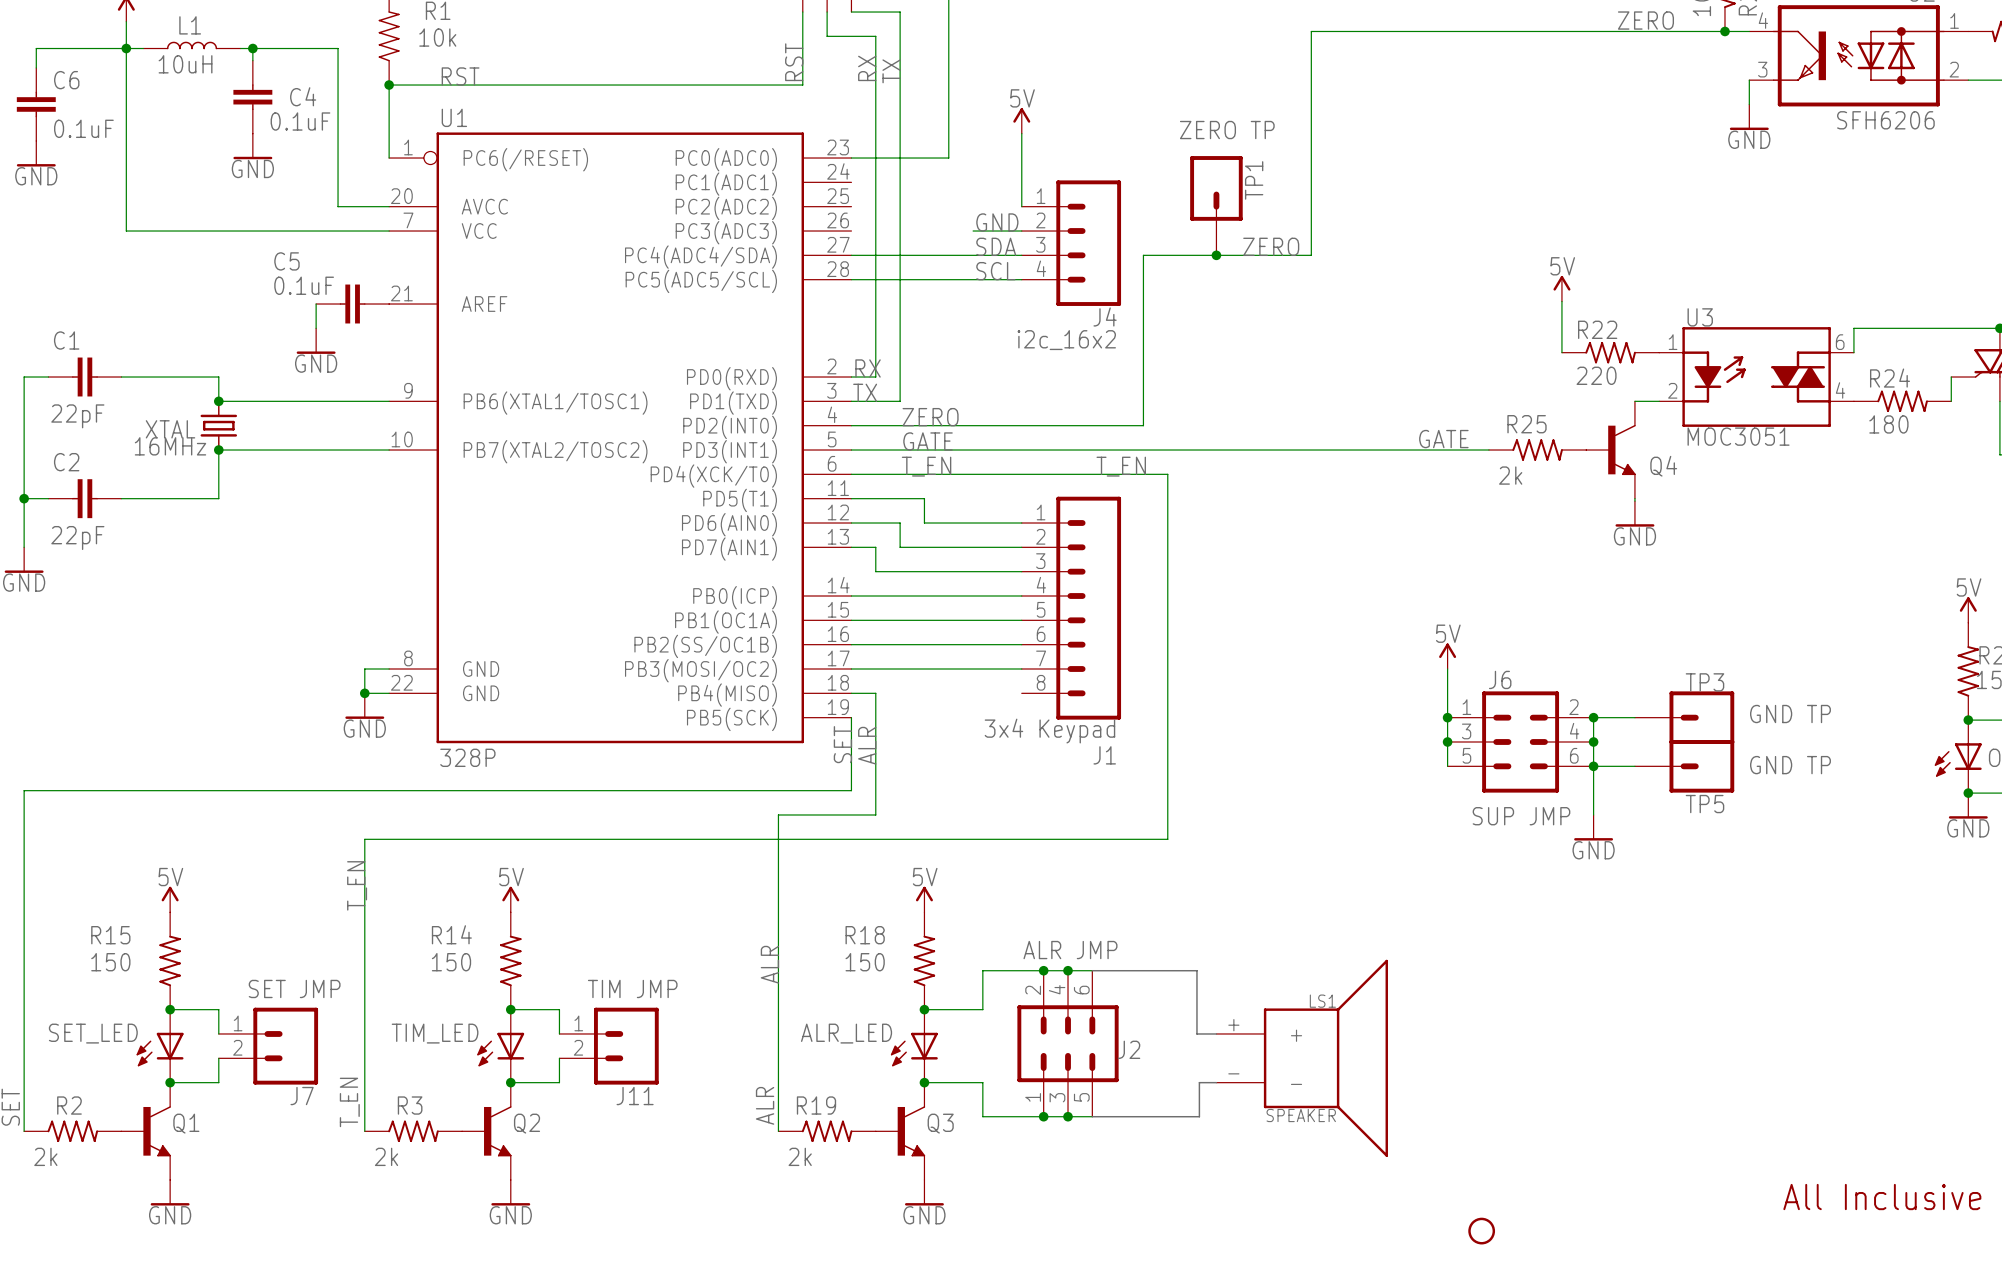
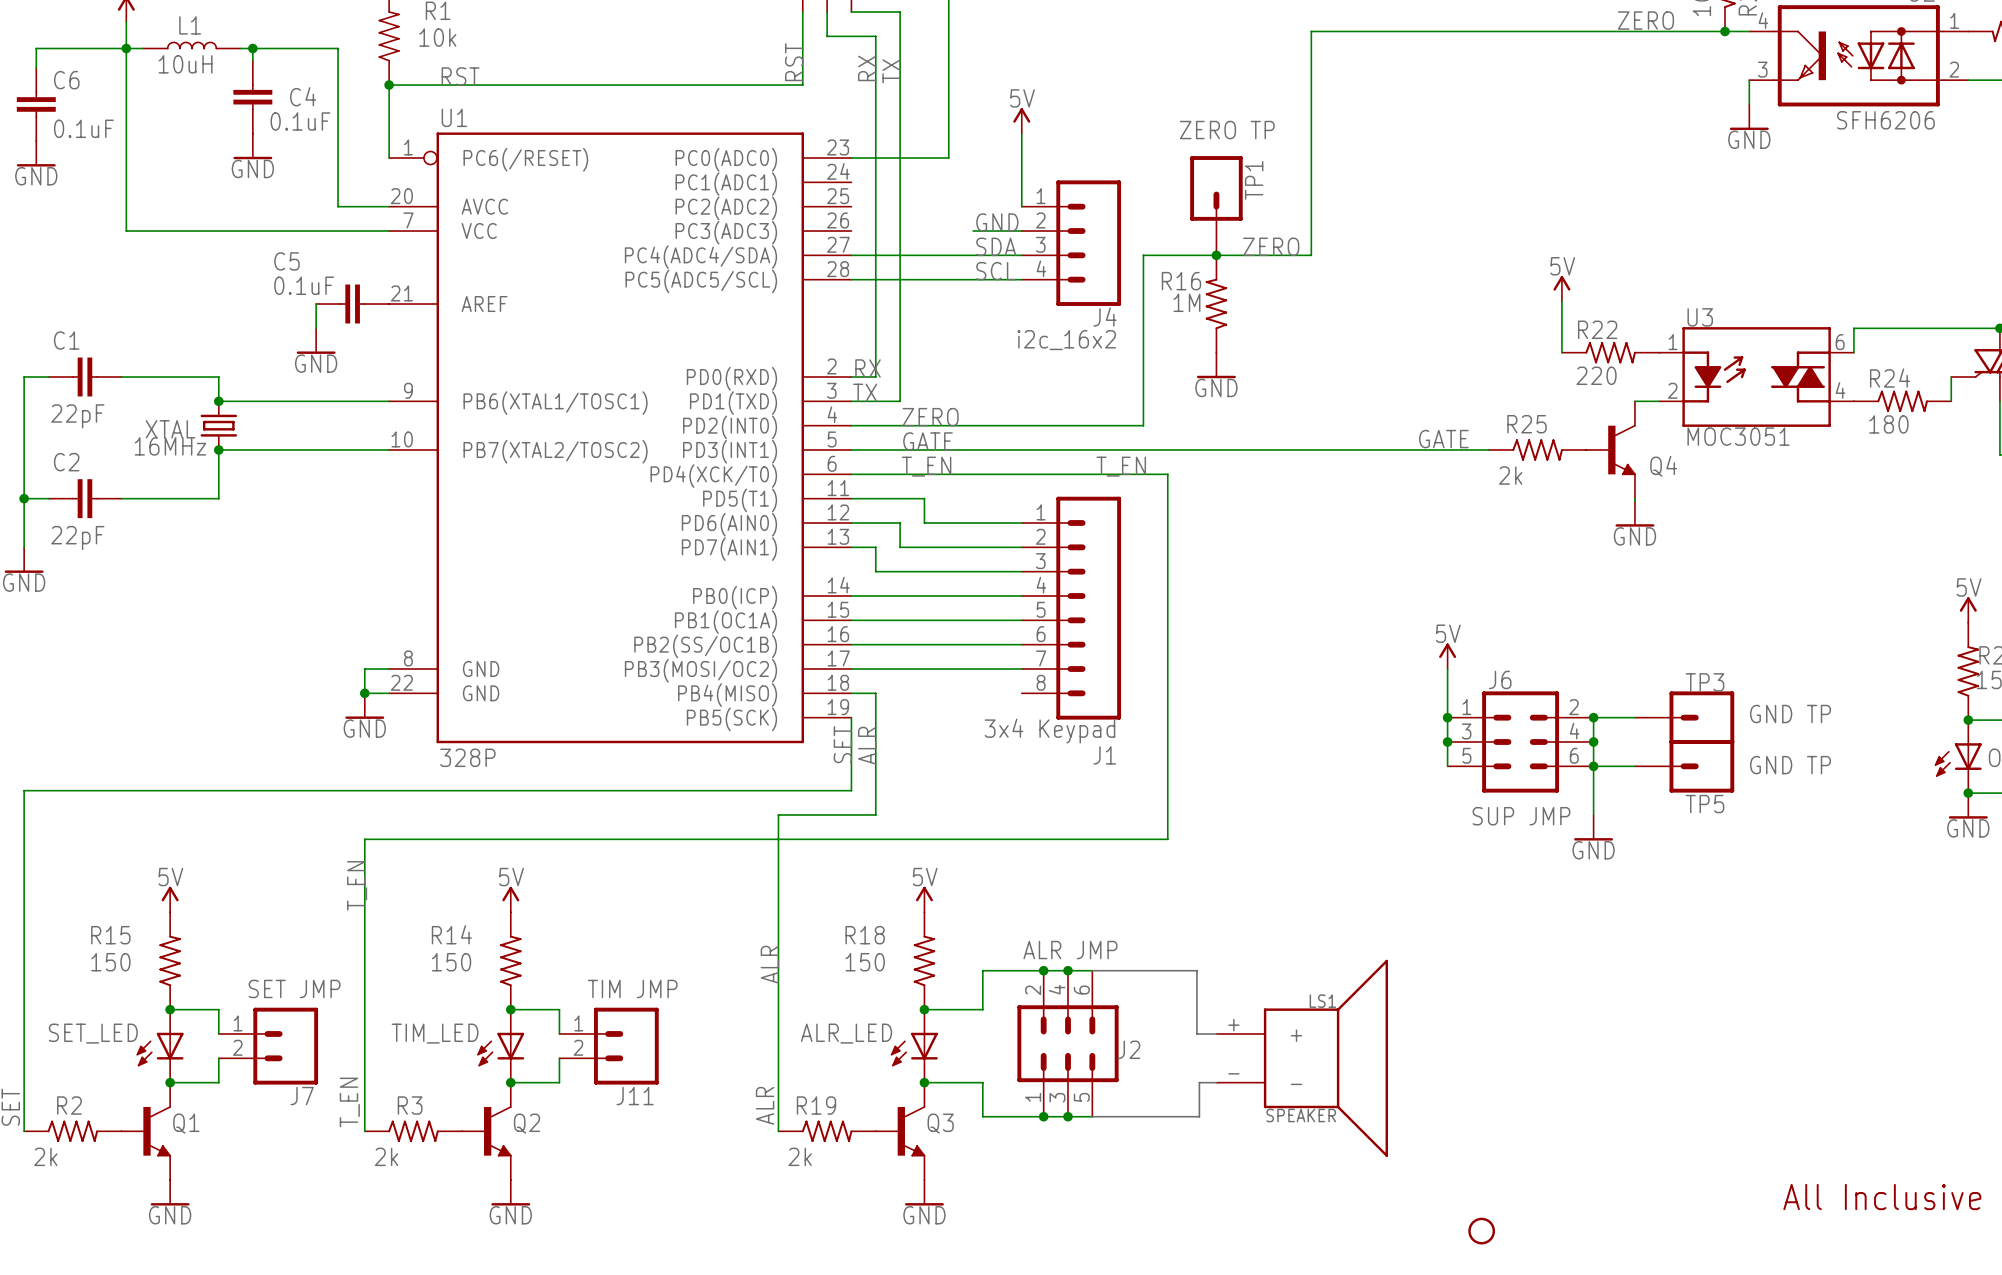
R16: none -> 1M (1216, 304)
power symbol: none -> GND (1216, 365)

